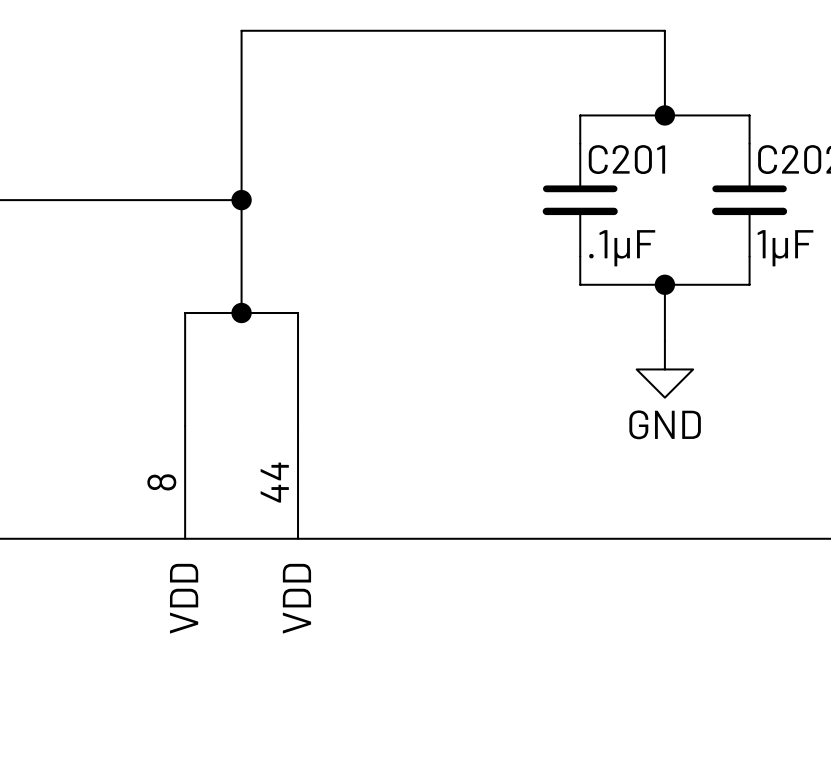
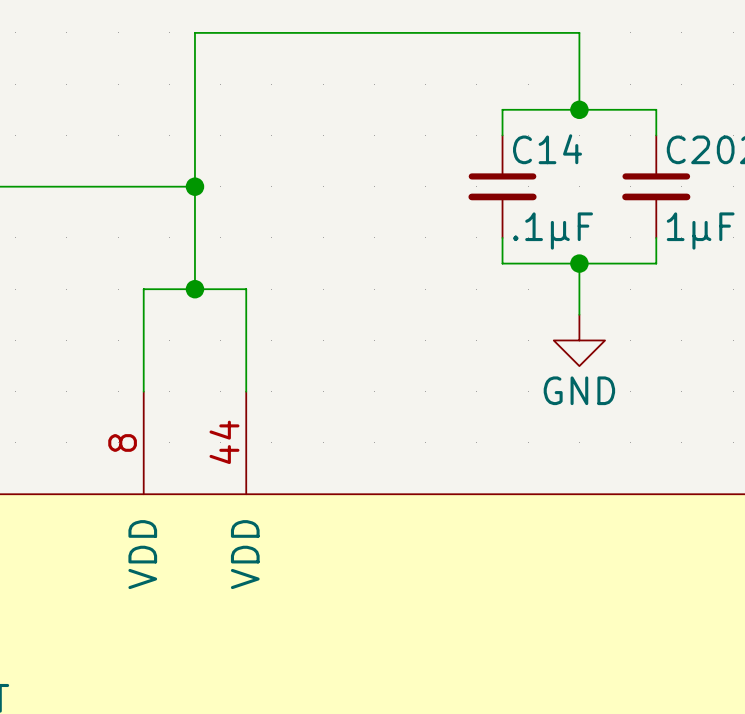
C201 name: C201 (626, 159) -> C14 (547, 149)

